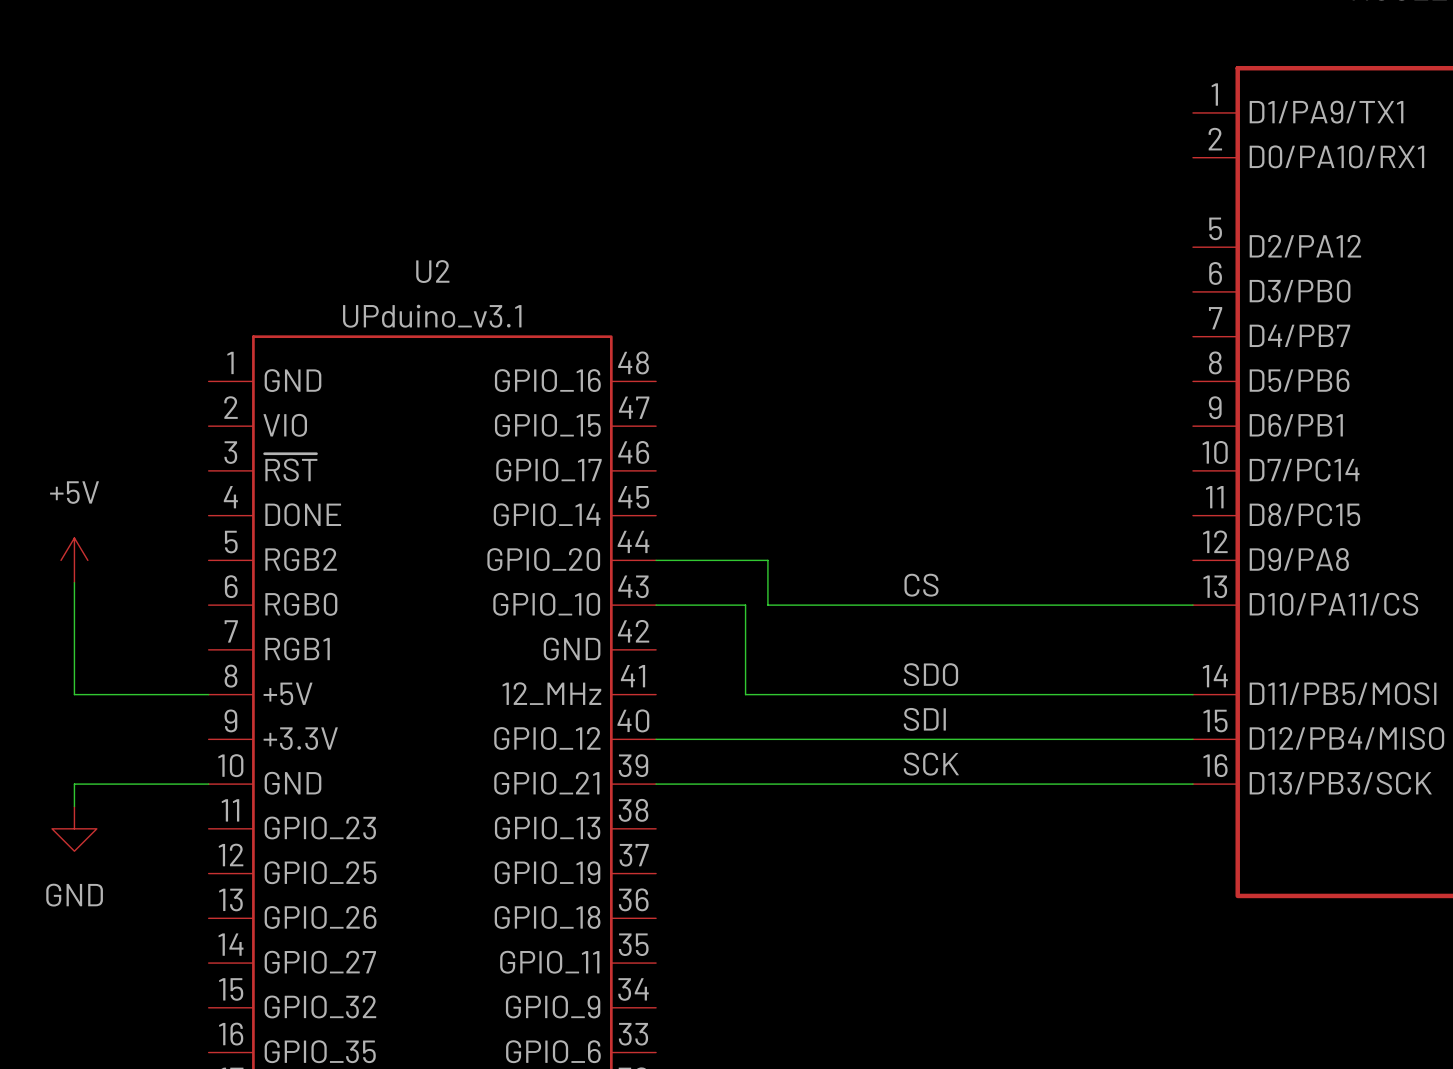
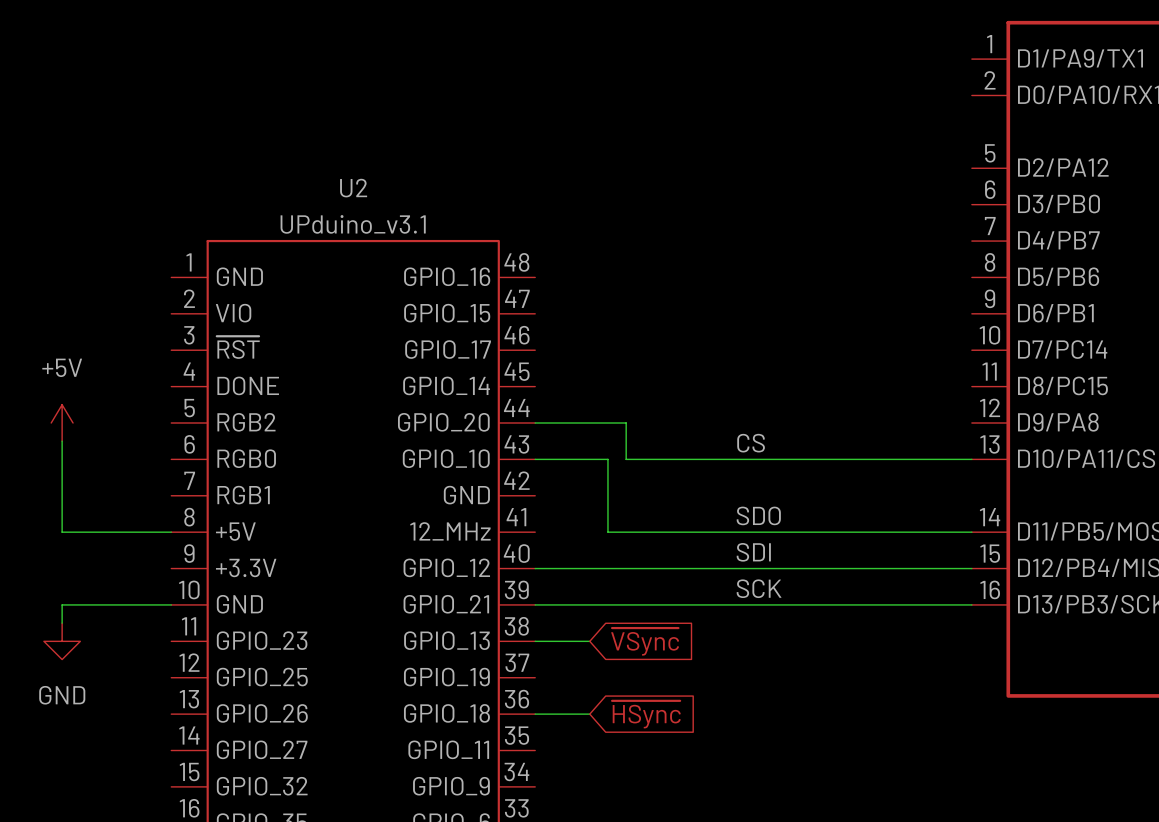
wire: none -> (535, 641) (589, 641)
global label: none -> ~{VSync} (645, 641)
wire: none -> (535, 714) (589, 714)
global label: none -> ~{HSync} (646, 714)

